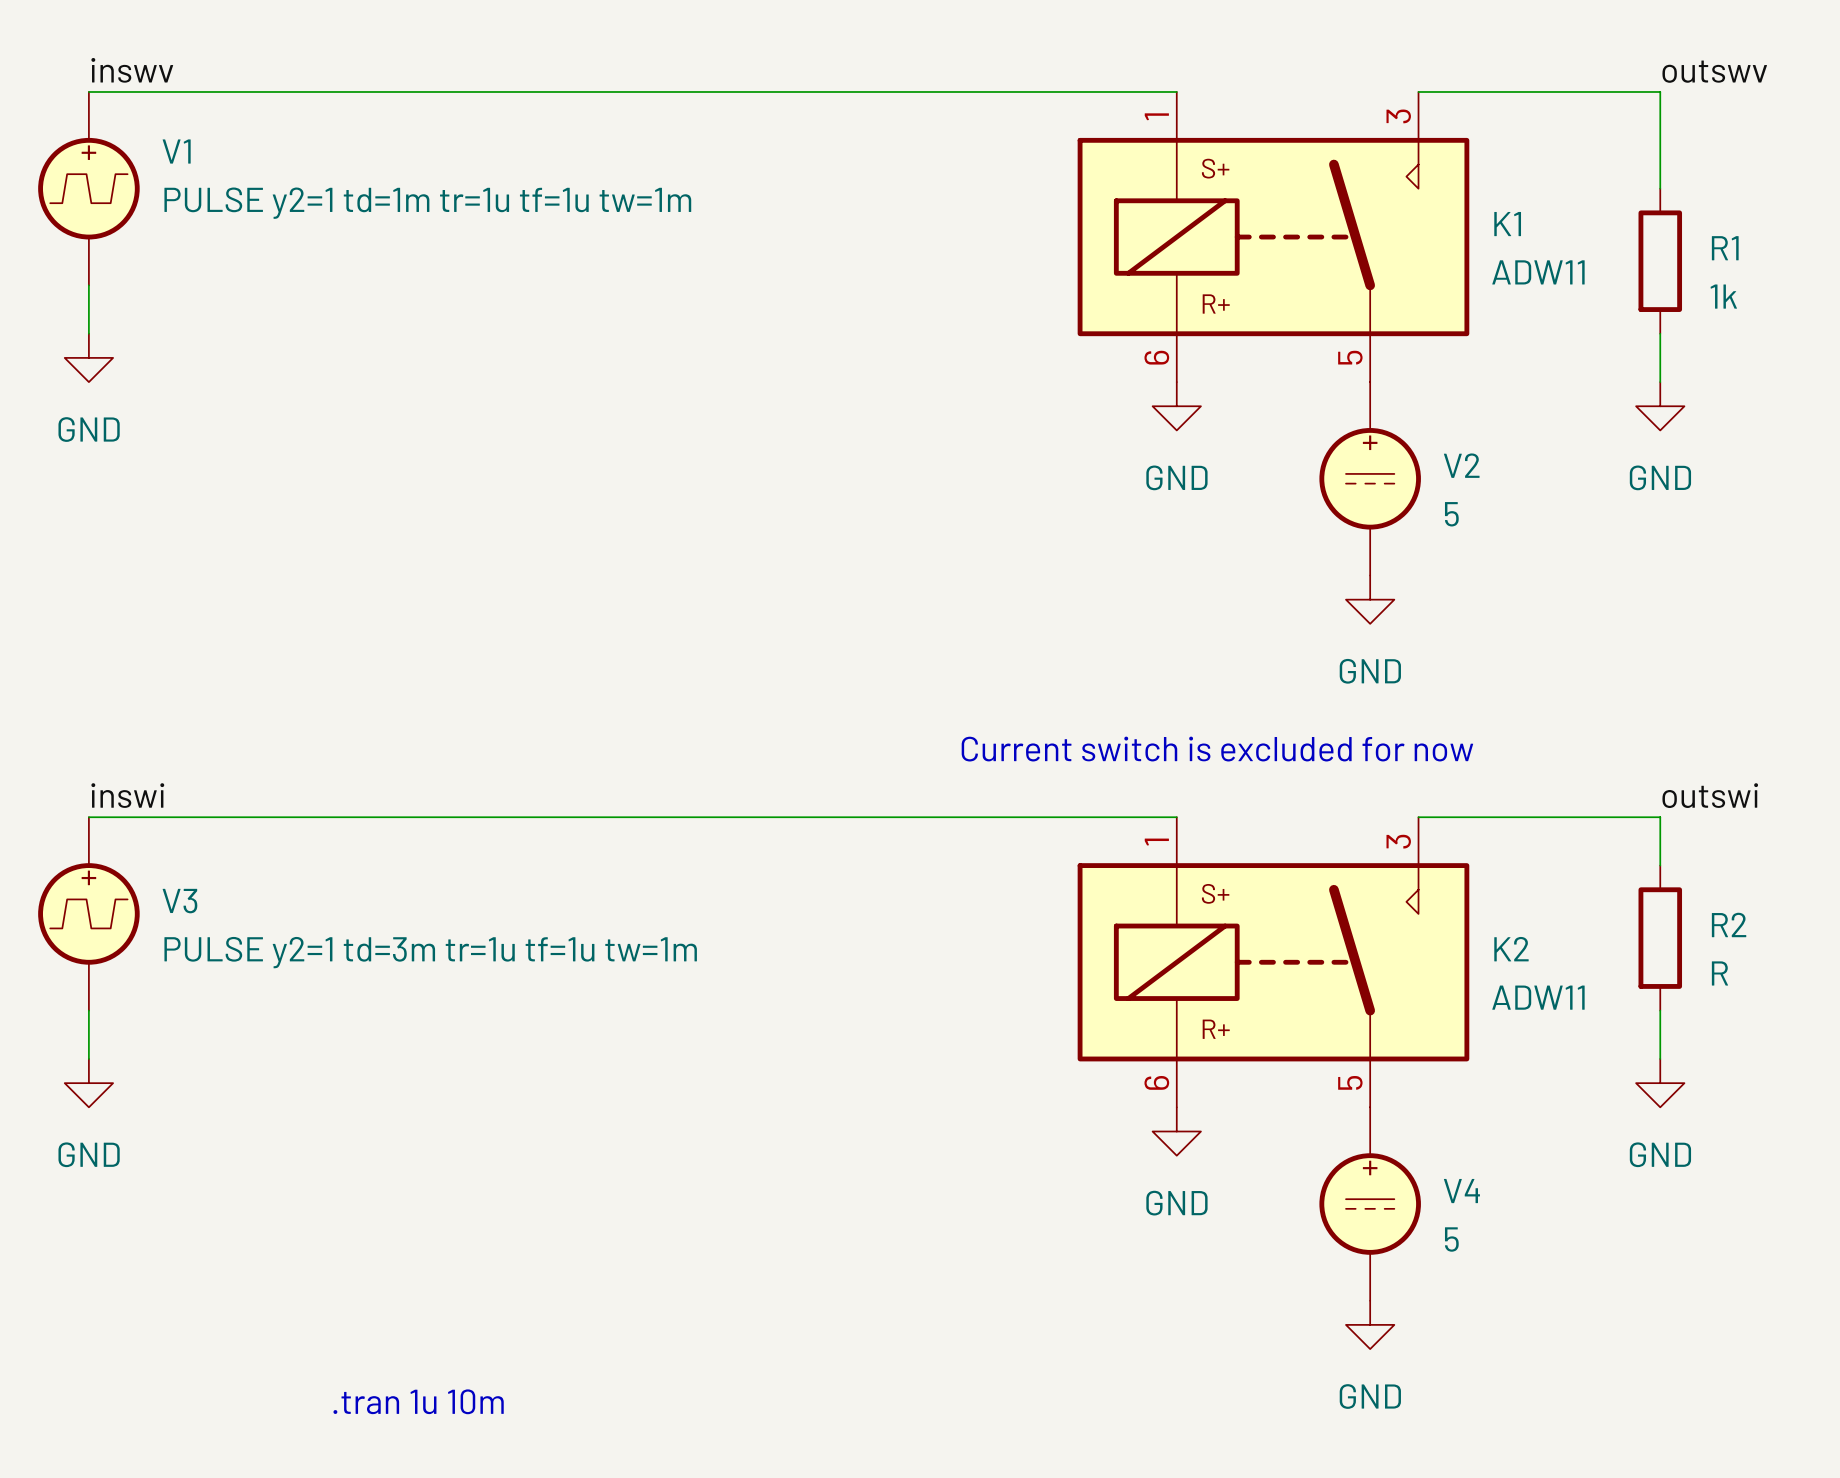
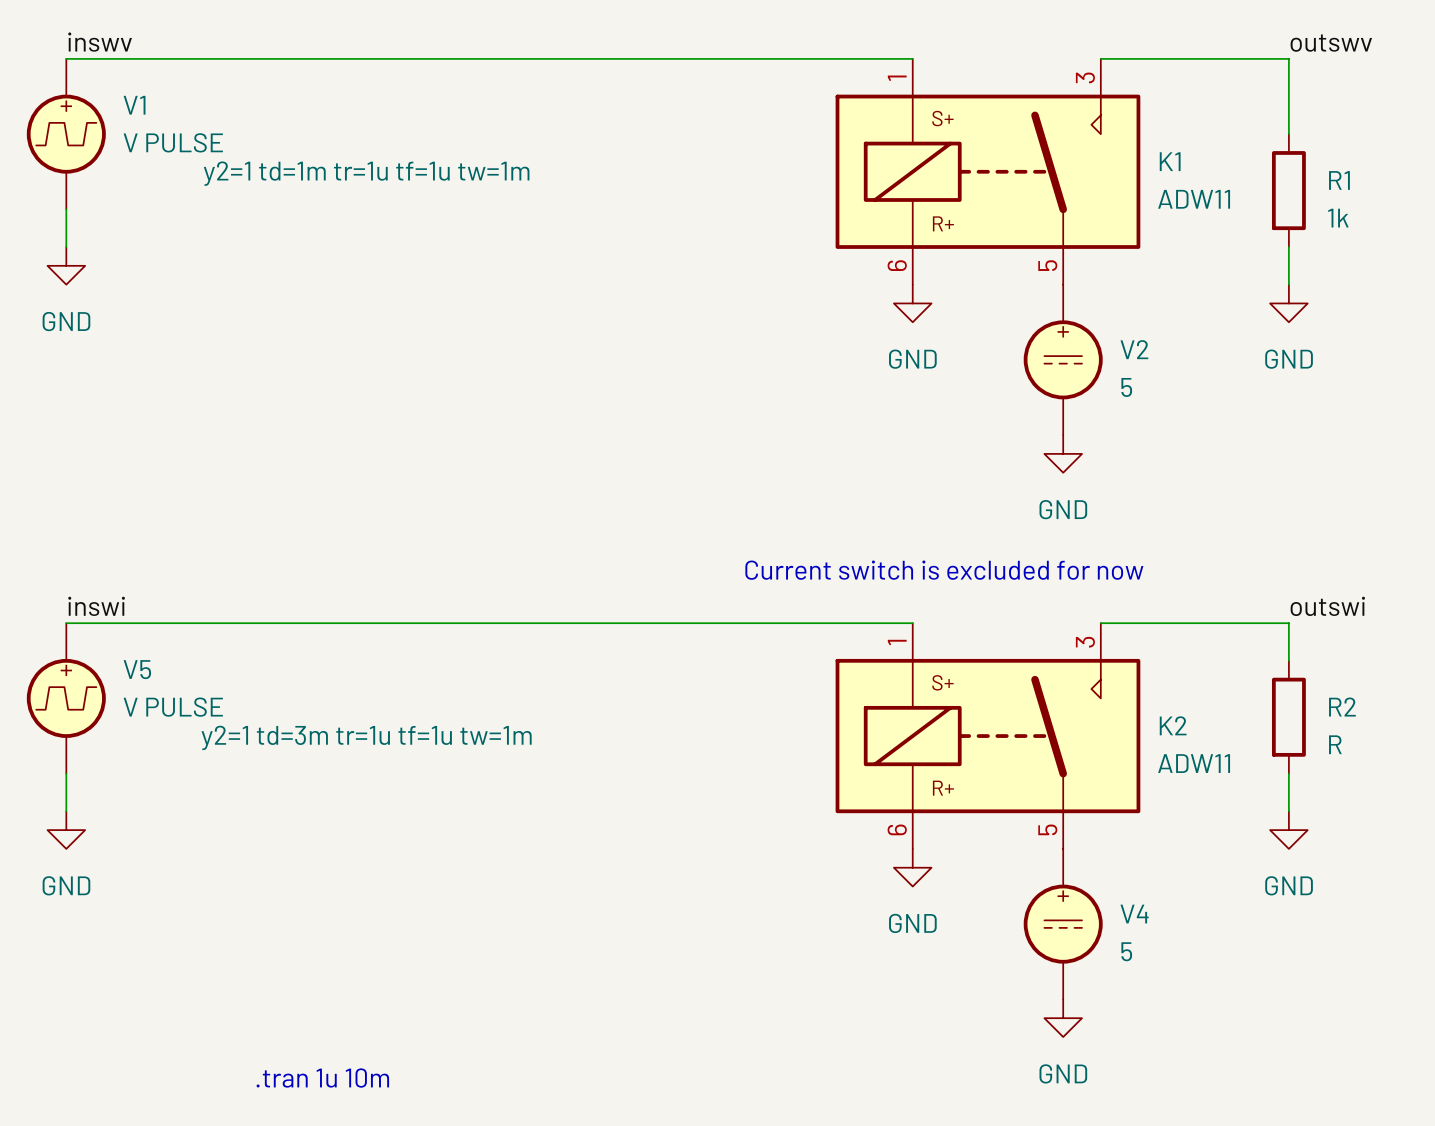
V1 value: PULSE y2=1 td=1m tr=1u tf=1u tw=1m (427, 203) -> V PULSE (173, 142)
V1 text: none -> y2=1 td=1m tr=1u tf=1u tw=1m (366, 173)
V3 name: V3 (179, 901) -> V5 (137, 669)
V3 value: PULSE y2=1 td=3m tr=1u tf=1u tw=1m (430, 952) -> V PULSE (173, 707)
V3 text: none -> y2=1 td=3m tr=1u tf=1u tw=1m (366, 737)

